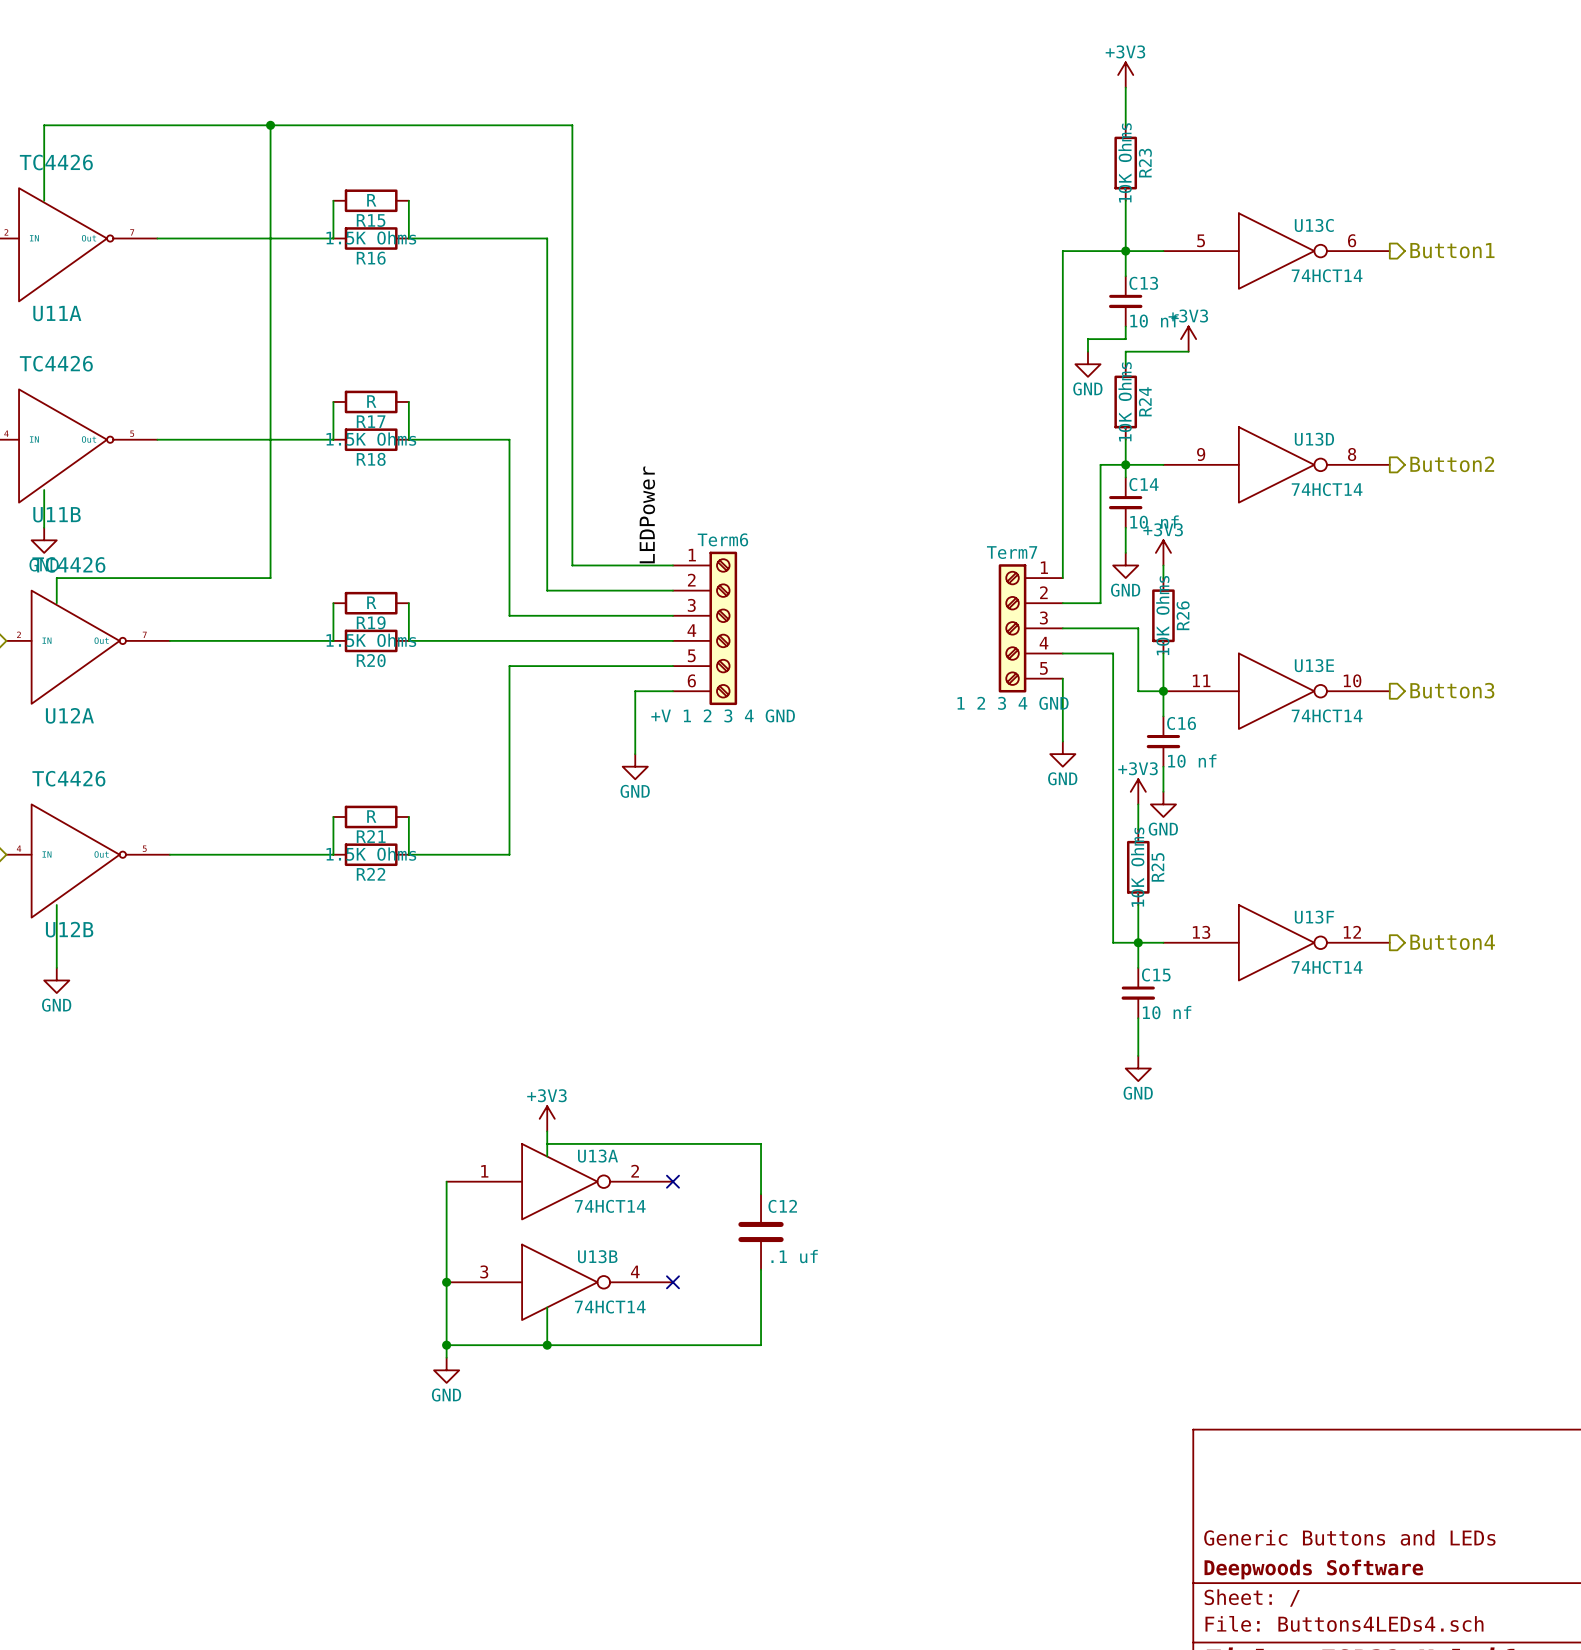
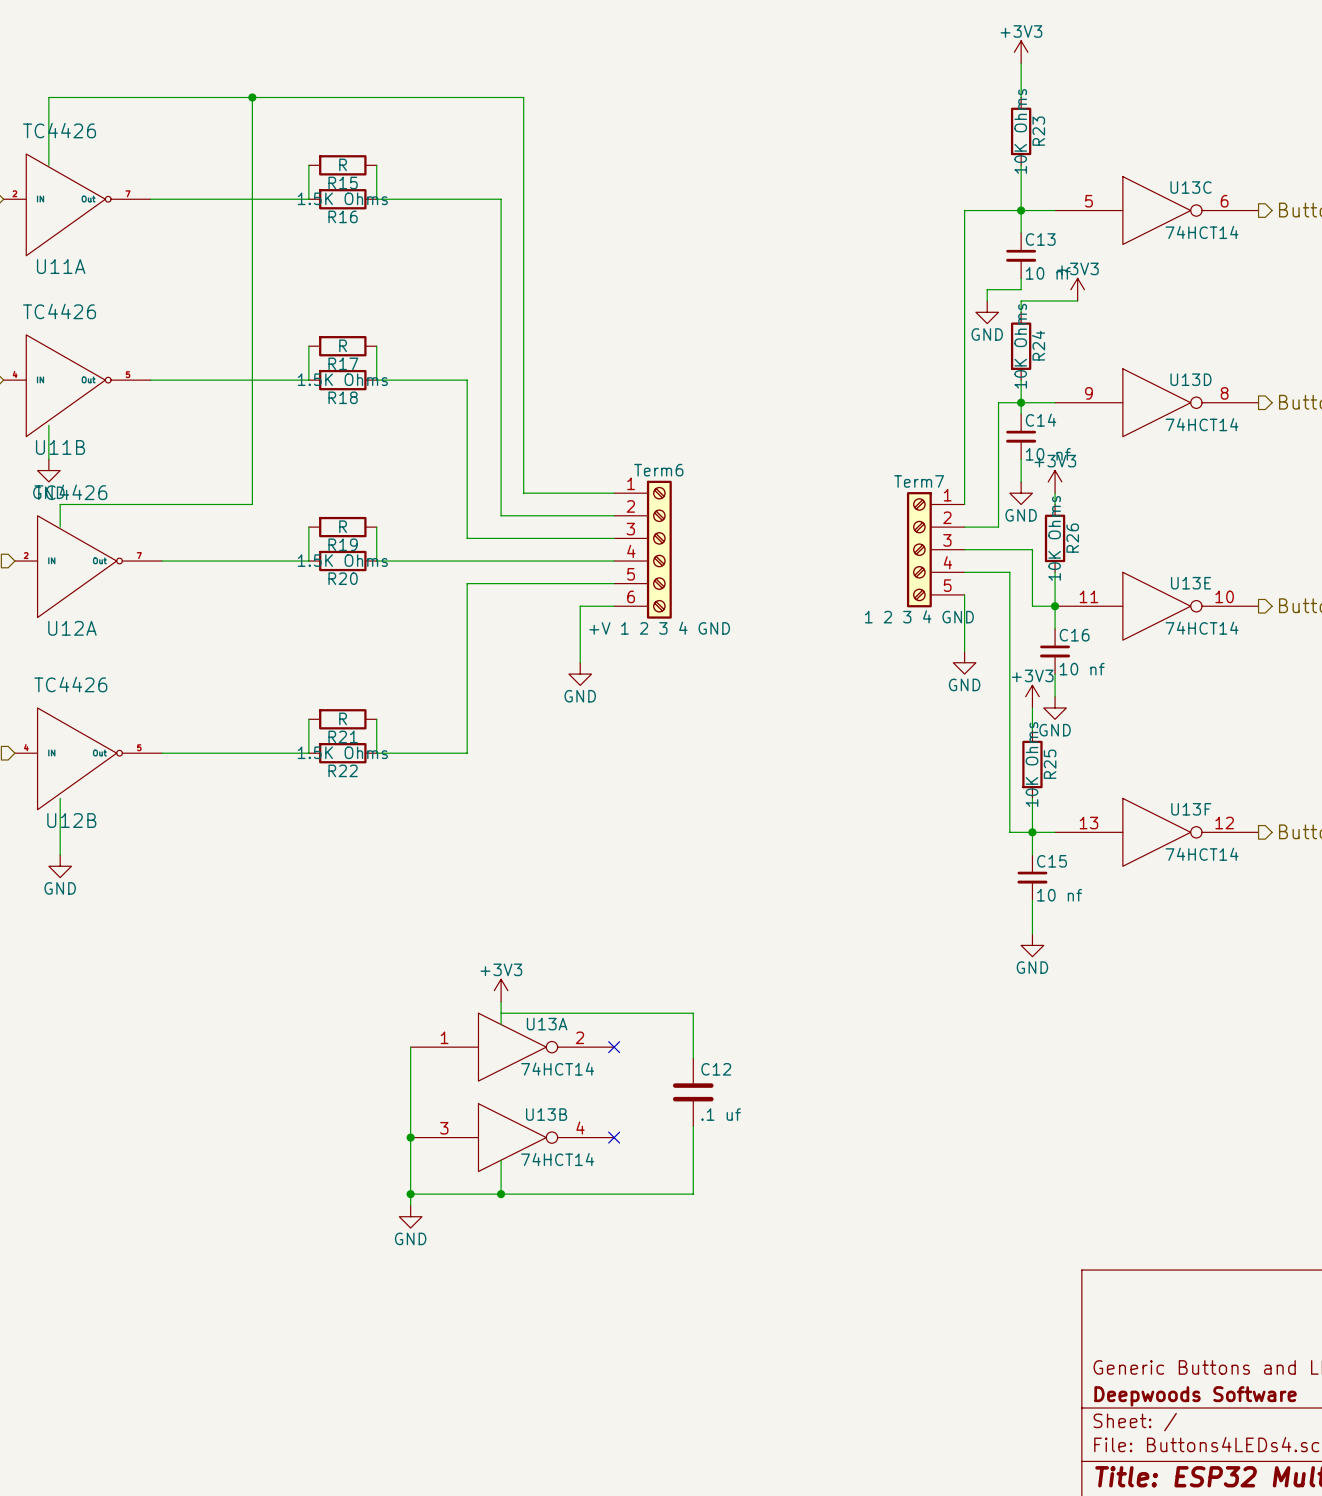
label: LEDPower (647, 514) -> none

